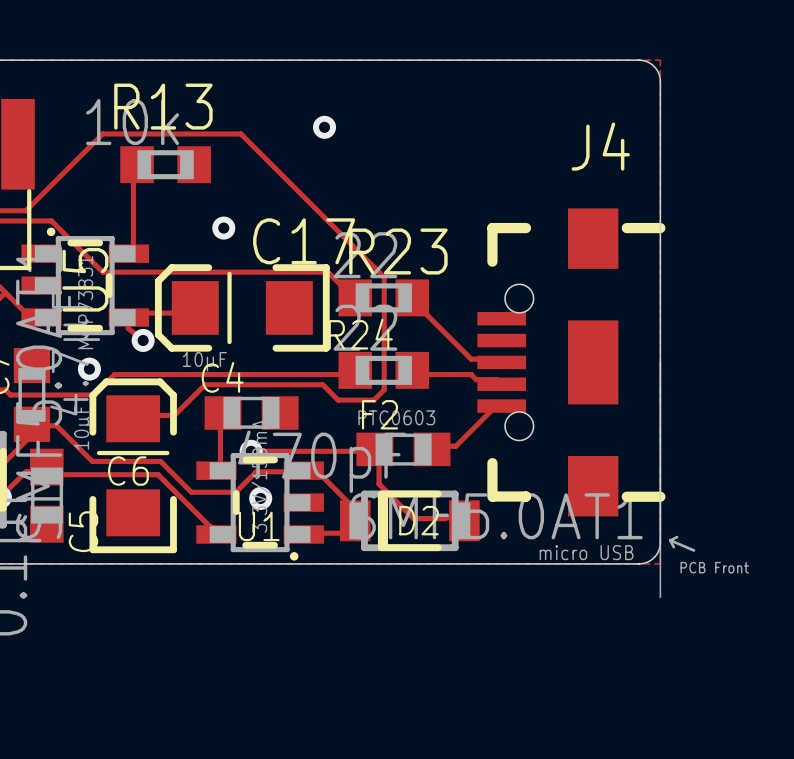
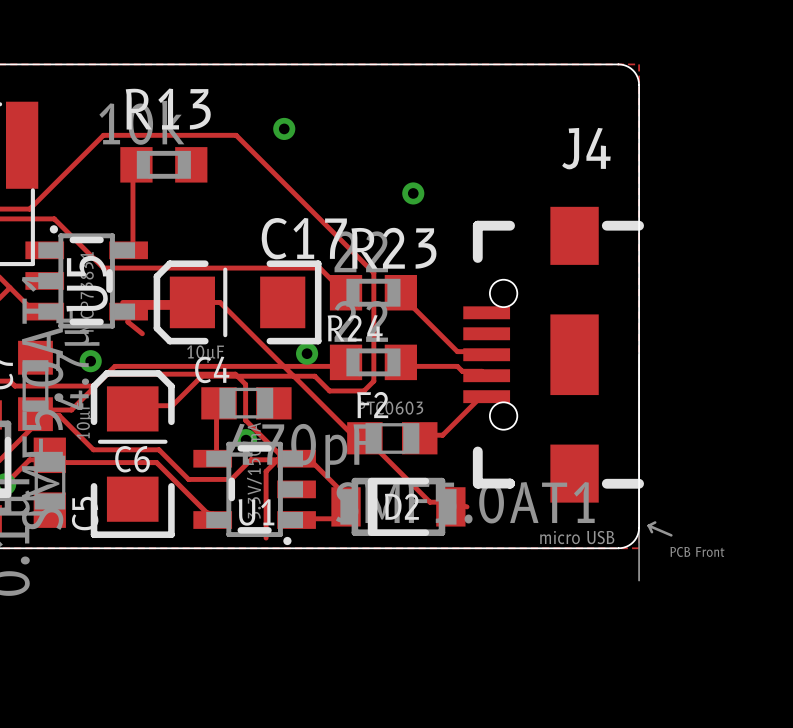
via position: (324, 127) -> (284, 128)
via: none -> (413, 193)
via: (223, 228) -> none
track: none -> (122, 302) (220, 302) (353, 435) (363, 435) (429, 502) (450, 502) (466, 506)
via: (143, 340) -> none
via: none -> (307, 353)
track: none -> (35, 414) (35, 410) (71, 410) (107, 374) (235, 374) (245, 384) (245, 420) (281, 456) (266, 471) (266, 538)
track: (251, 451) (373, 451) (374, 449) (379, 451) (379, 484) (413, 518) (460, 517) (464, 520) -> none
via: (260, 498) -> none

